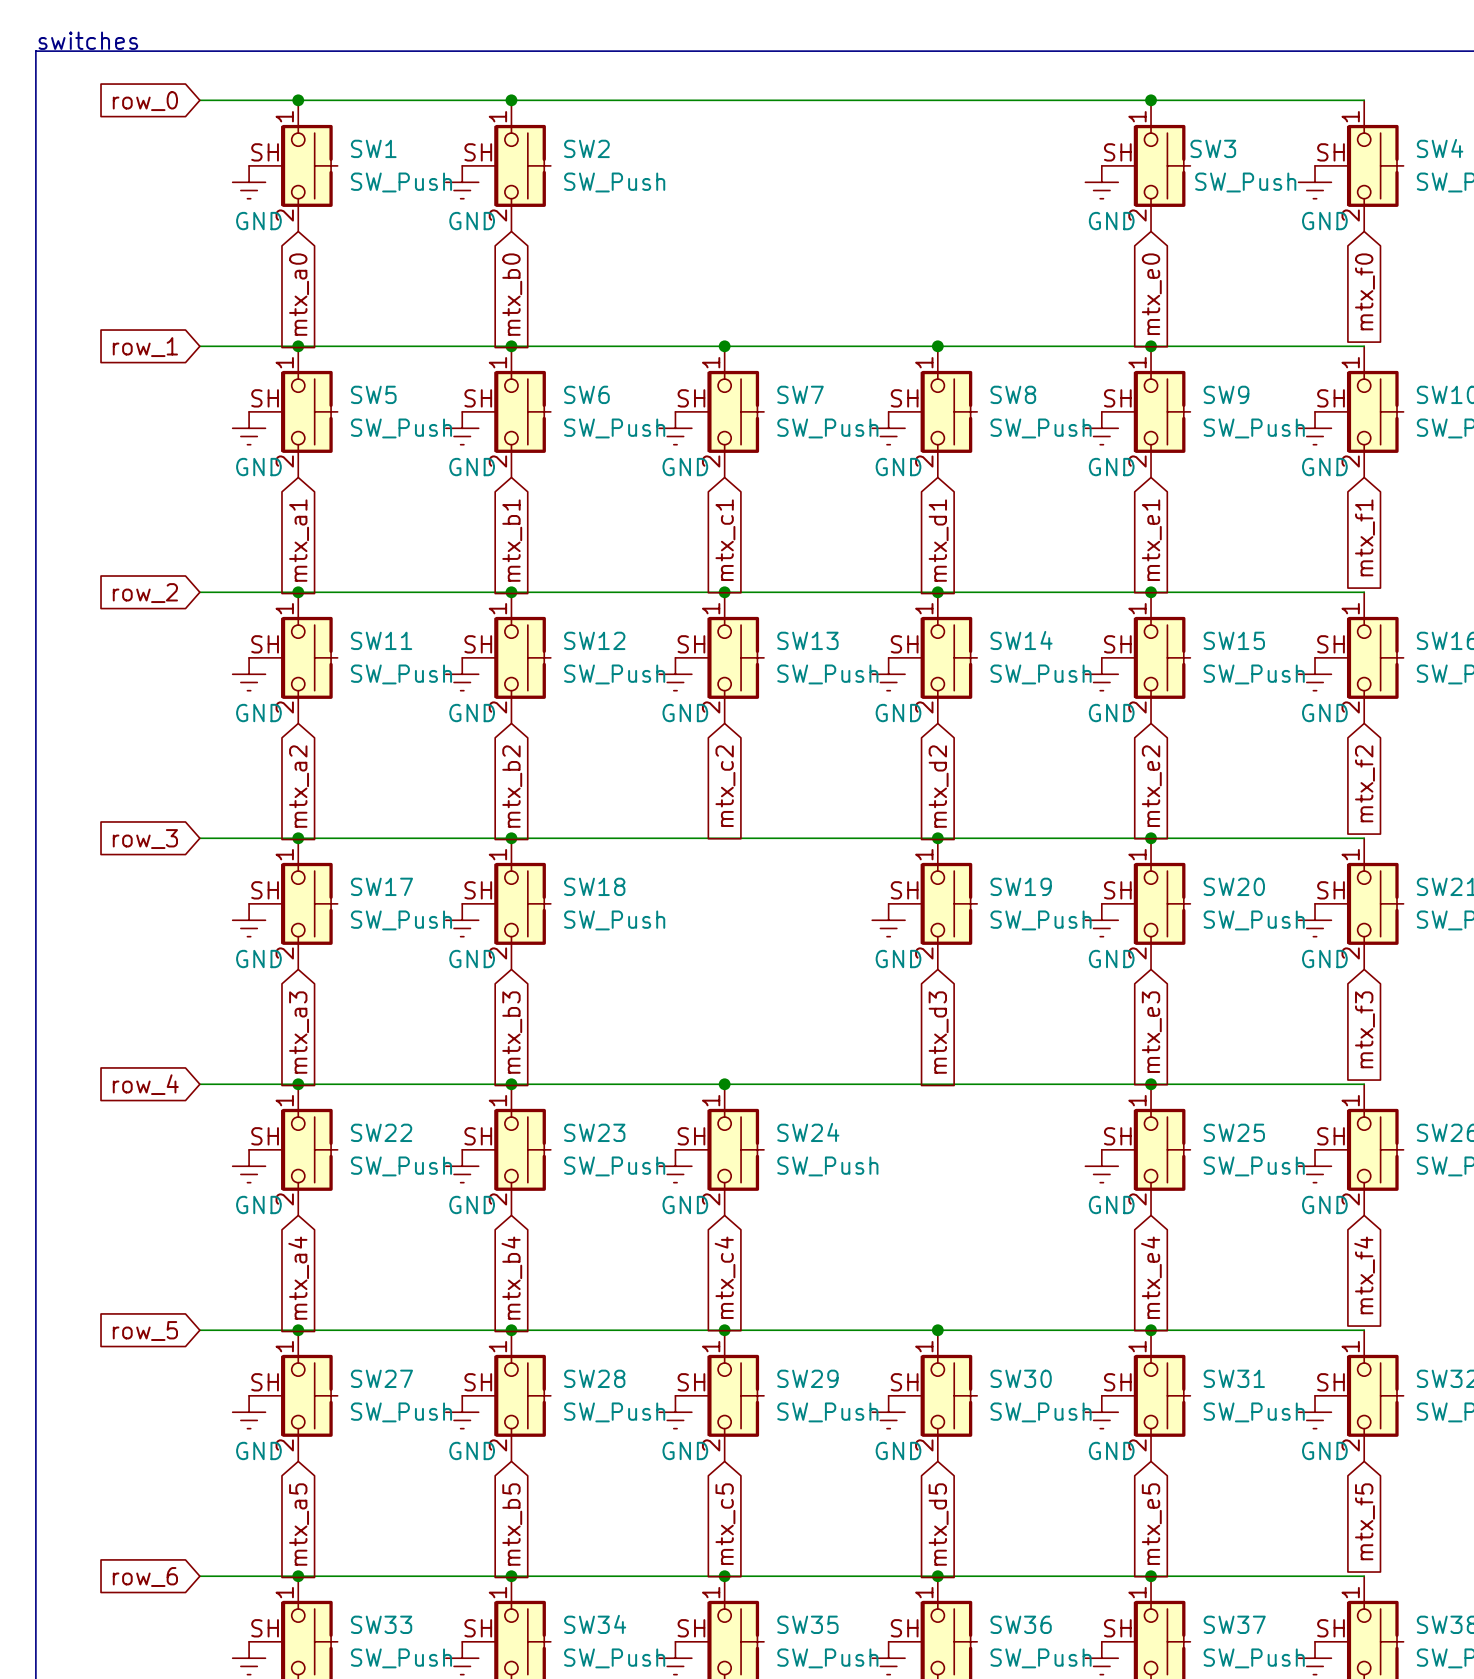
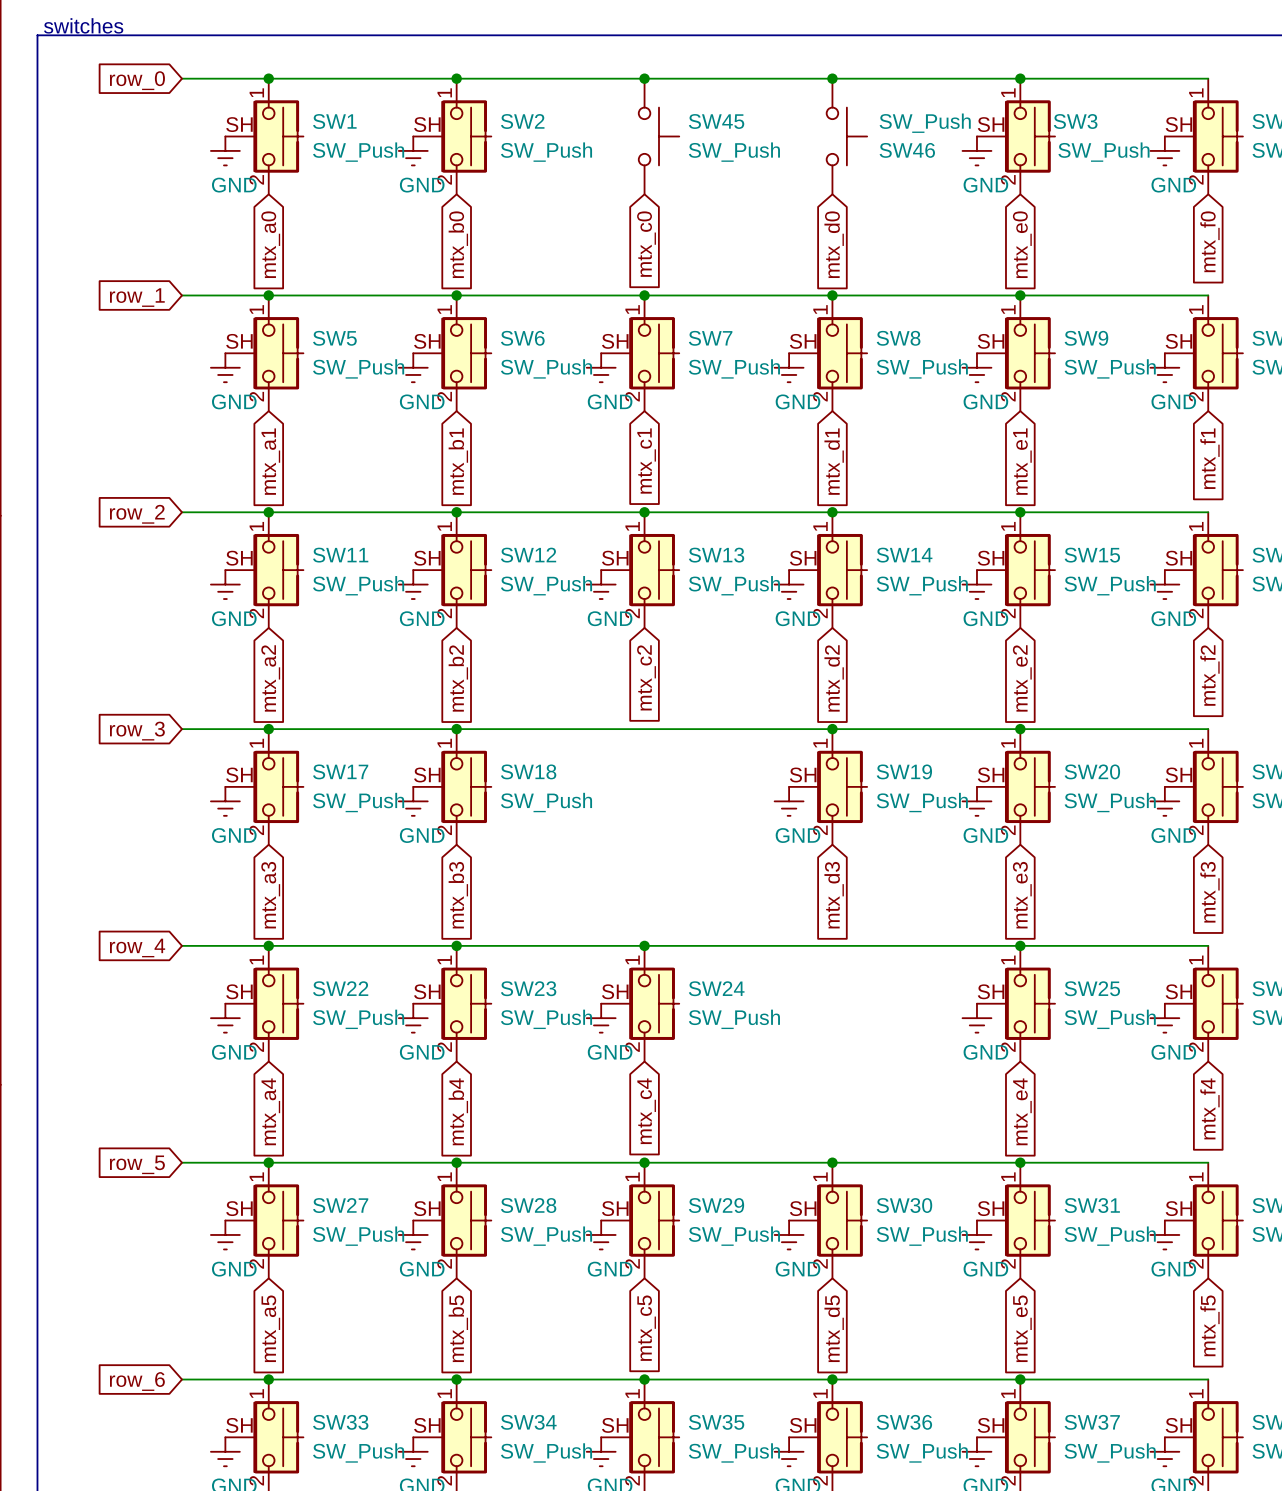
junction: none -> (644, 78)
junction: none -> (832, 78)
SW45: none -> SW_Push (659, 136)
SW46: none -> SW_Push (846, 136)
global label: none -> mtx_c0 (646, 244)
global label: none -> mtx_d0 (834, 244)

